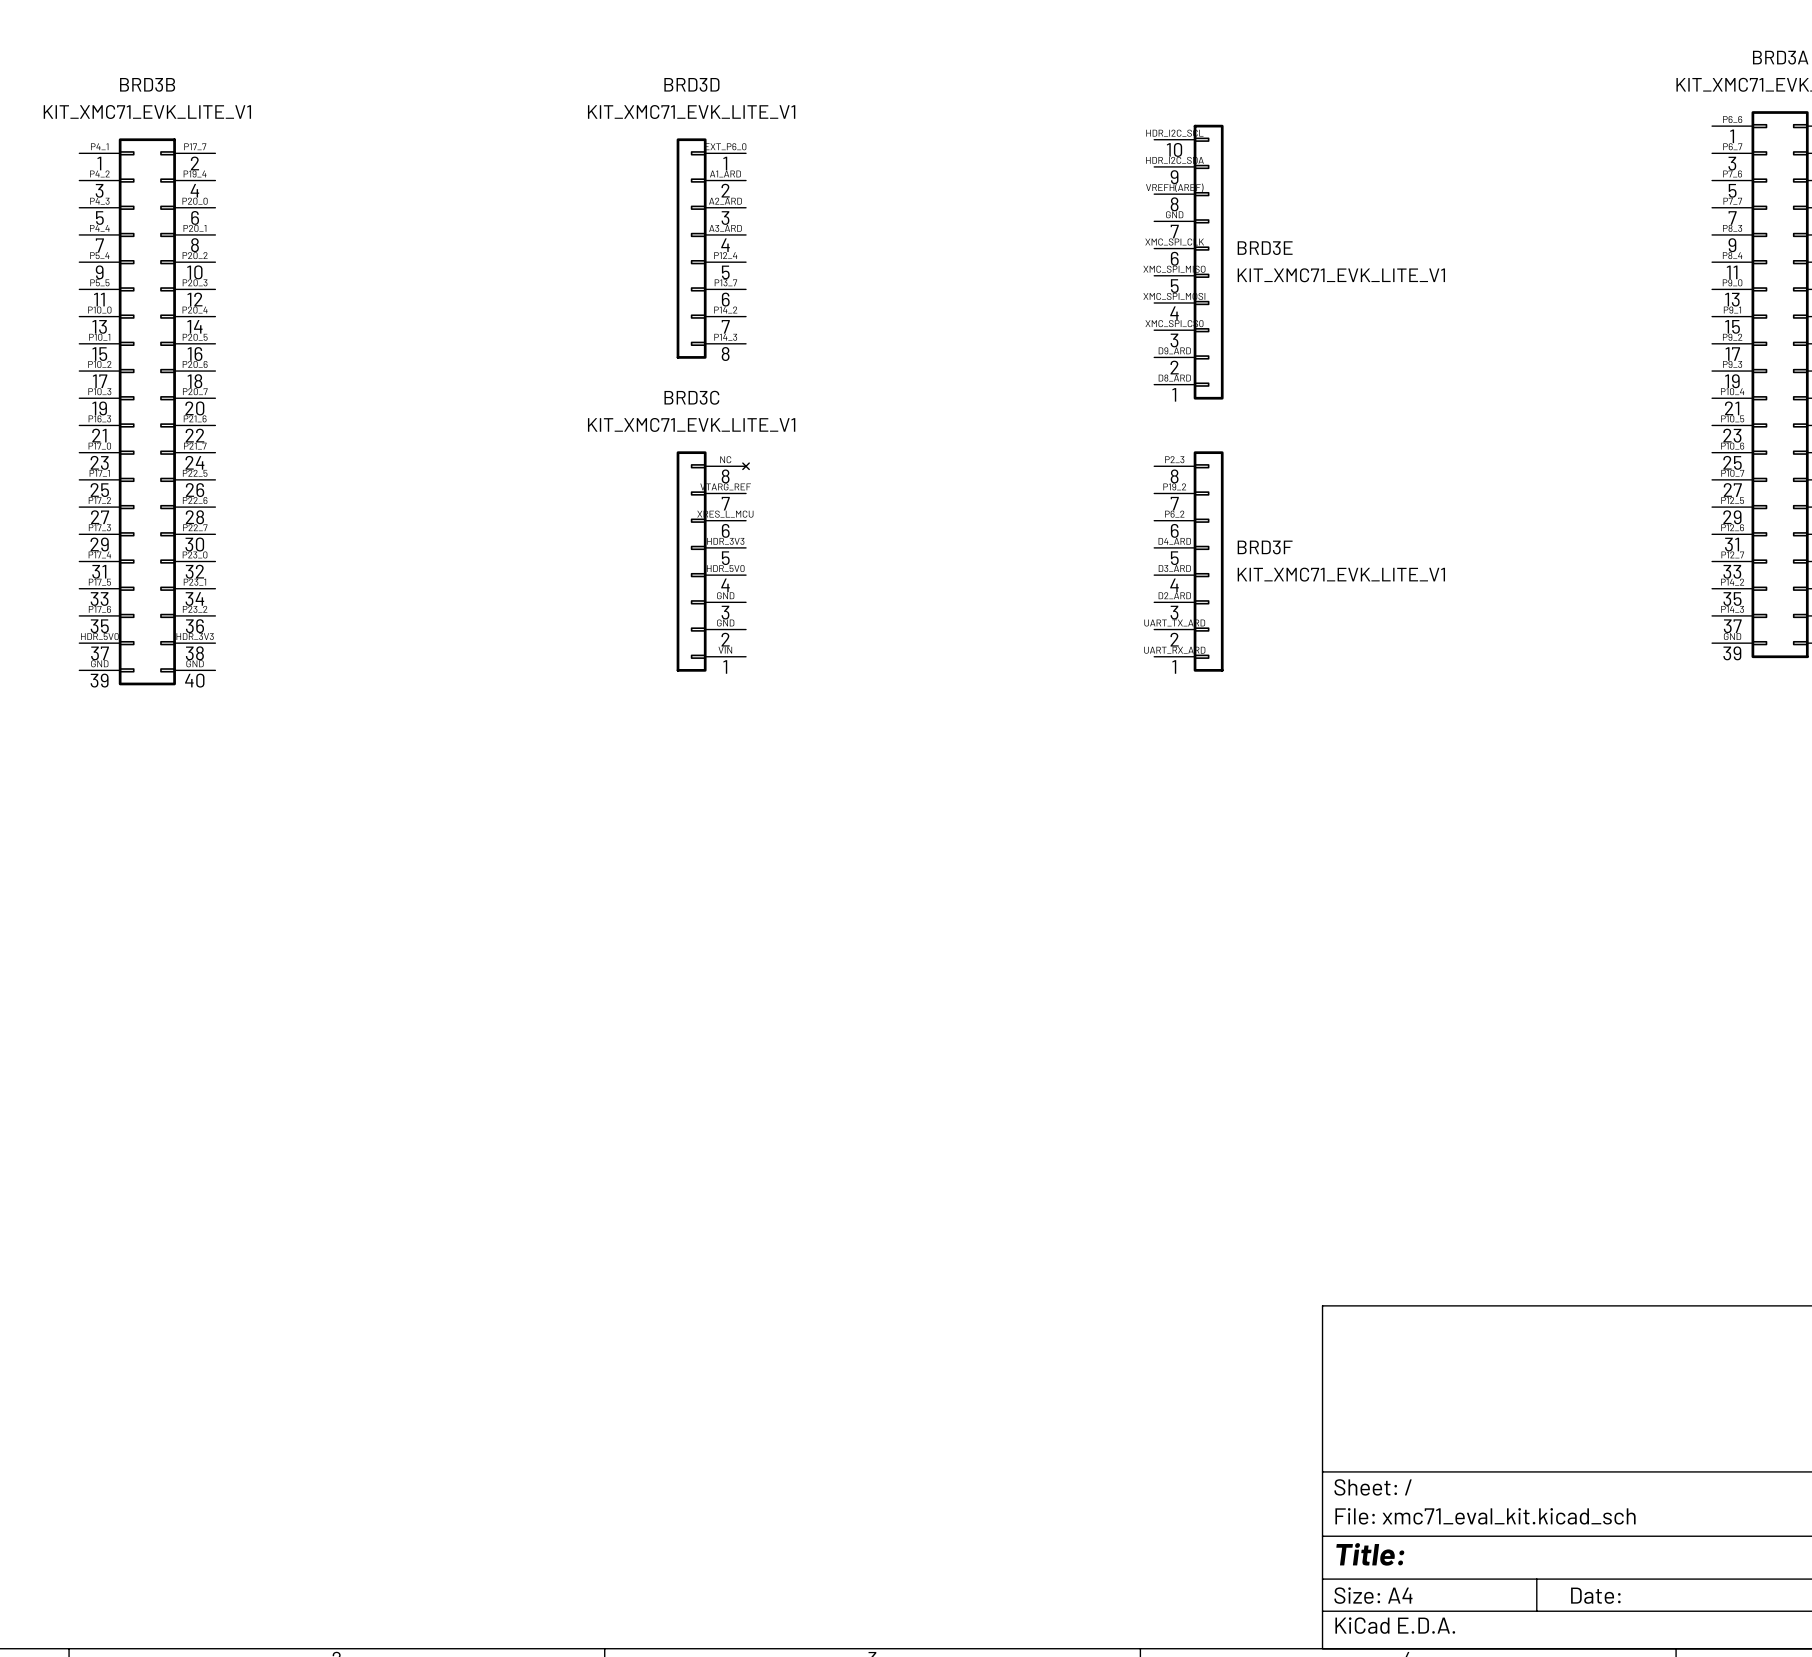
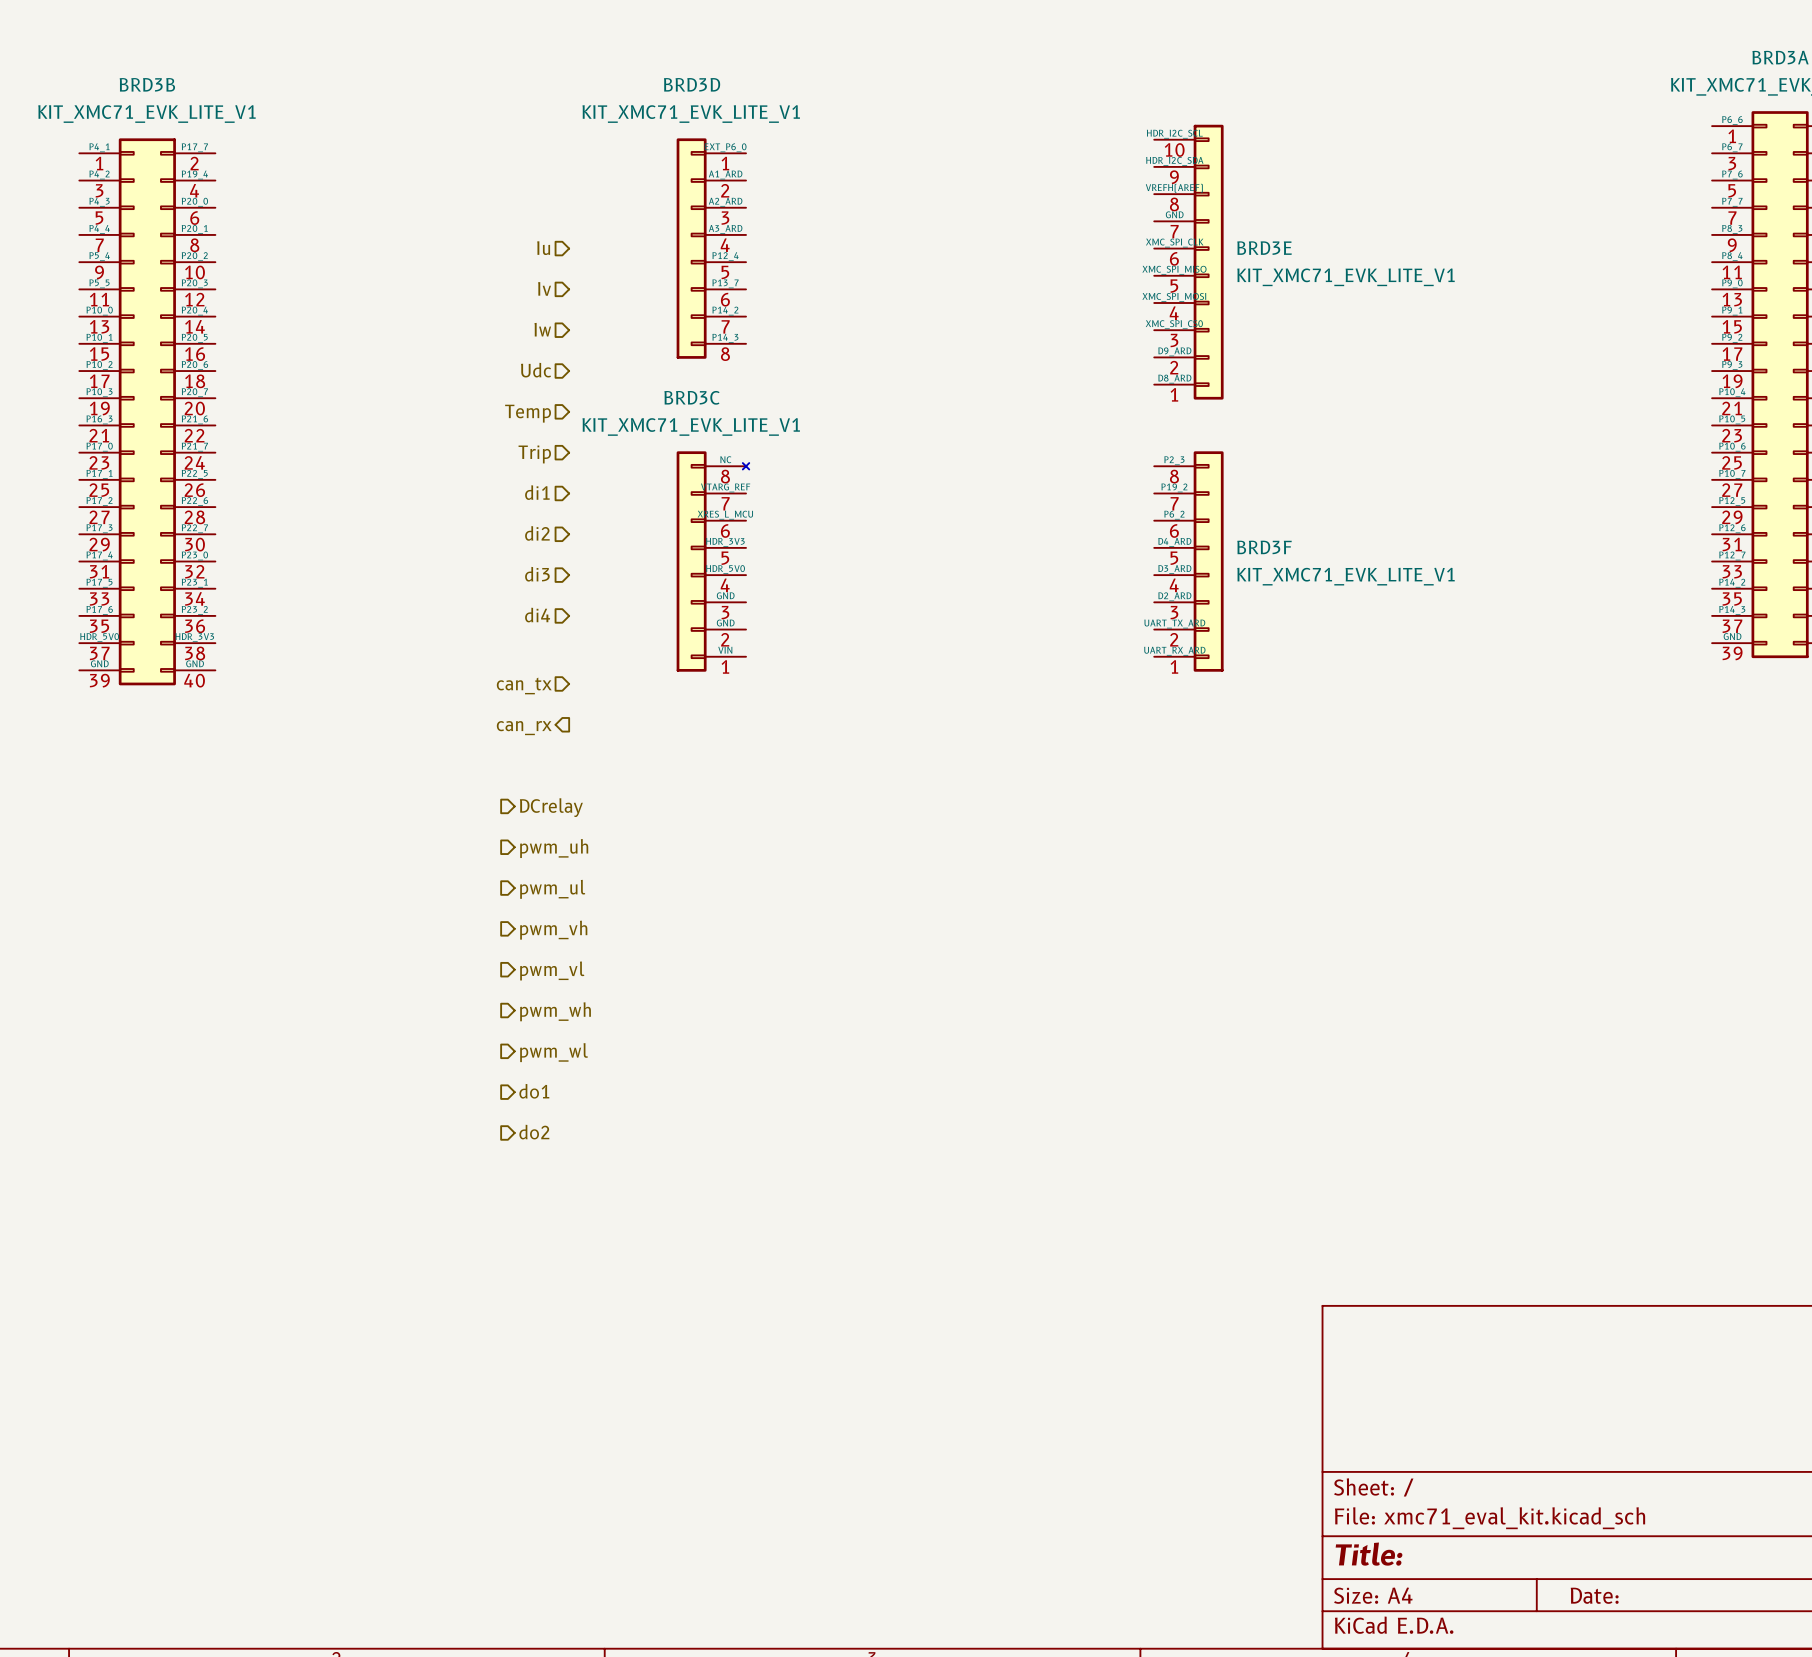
hierarchical label: none -> Iu (543, 248)
hierarchical label: none -> Iv (544, 288)
hierarchical label: none -> Iw (542, 329)
hierarchical label: none -> Udc (536, 370)
hierarchical label: none -> Temp (528, 413)
hierarchical label: none -> Trip (534, 454)
hierarchical label: none -> di1 (537, 492)
hierarchical label: none -> di2 (537, 533)
hierarchical label: none -> di3 (537, 574)
hierarchical label: none -> di4 (537, 615)
hierarchical label: none -> can_tx (524, 685)
hierarchical label: none -> can_rx (524, 728)
hierarchical label: none -> DCrelay (551, 807)
hierarchical label: none -> pwm_uh (554, 848)
hierarchical label: none -> pwm_ul (552, 889)
hierarchical label: none -> pwm_vh (553, 930)
hierarchical label: none -> pwm_vl (552, 970)
hierarchical label: none -> pwm_wh (555, 1011)
hierarchical label: none -> pwm_wl (554, 1052)
hierarchical label: none -> do1 (534, 1091)
hierarchical label: none -> do2 (534, 1132)

